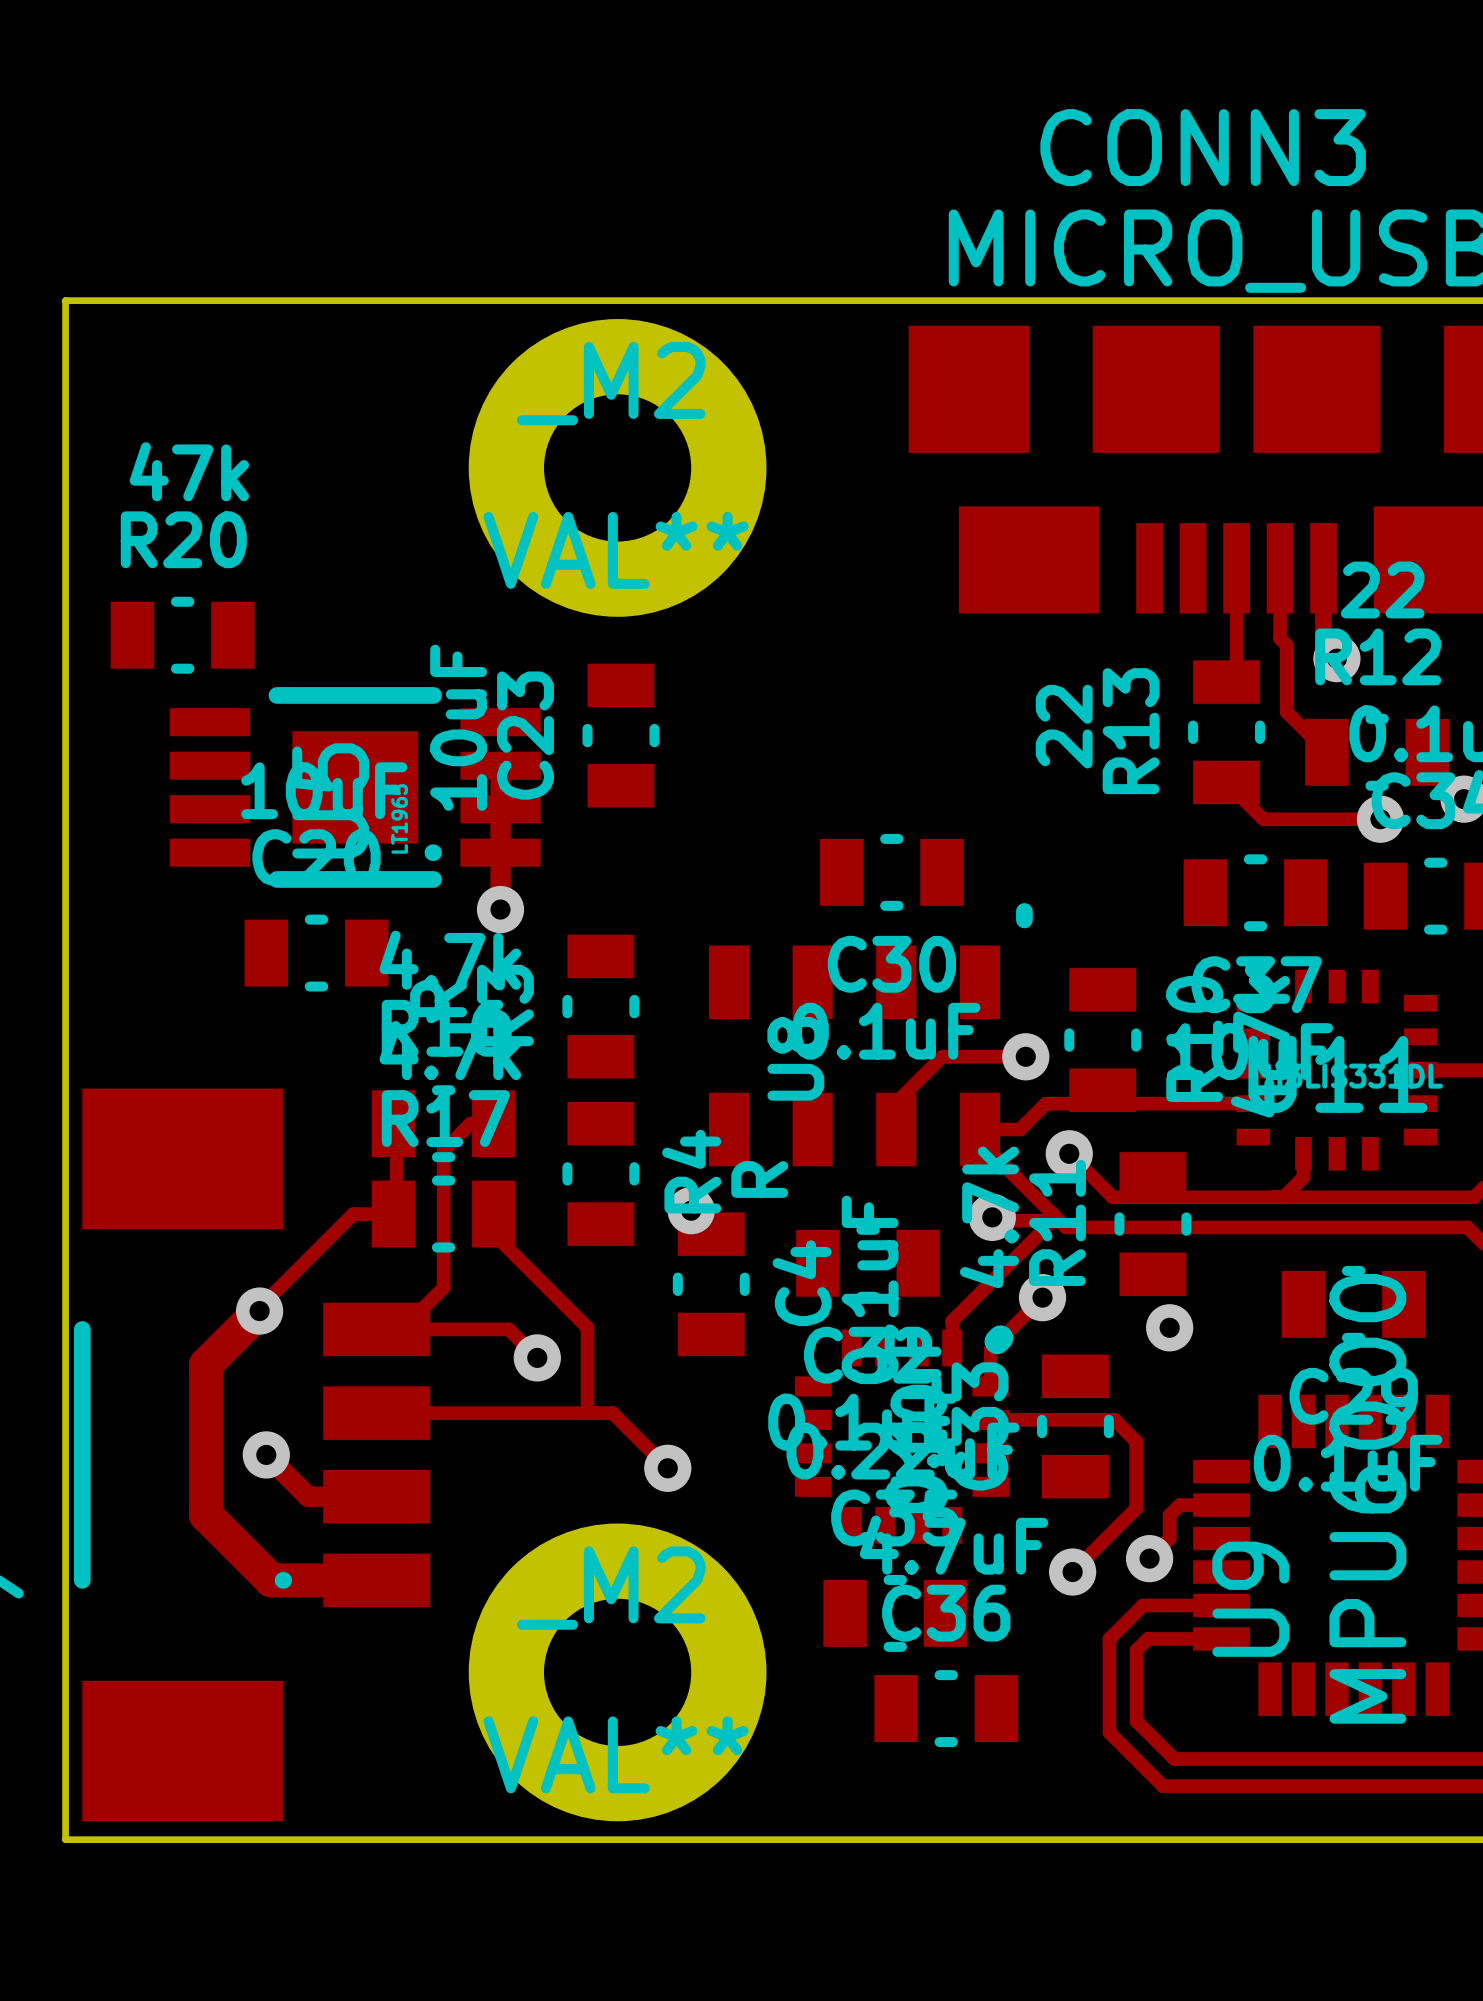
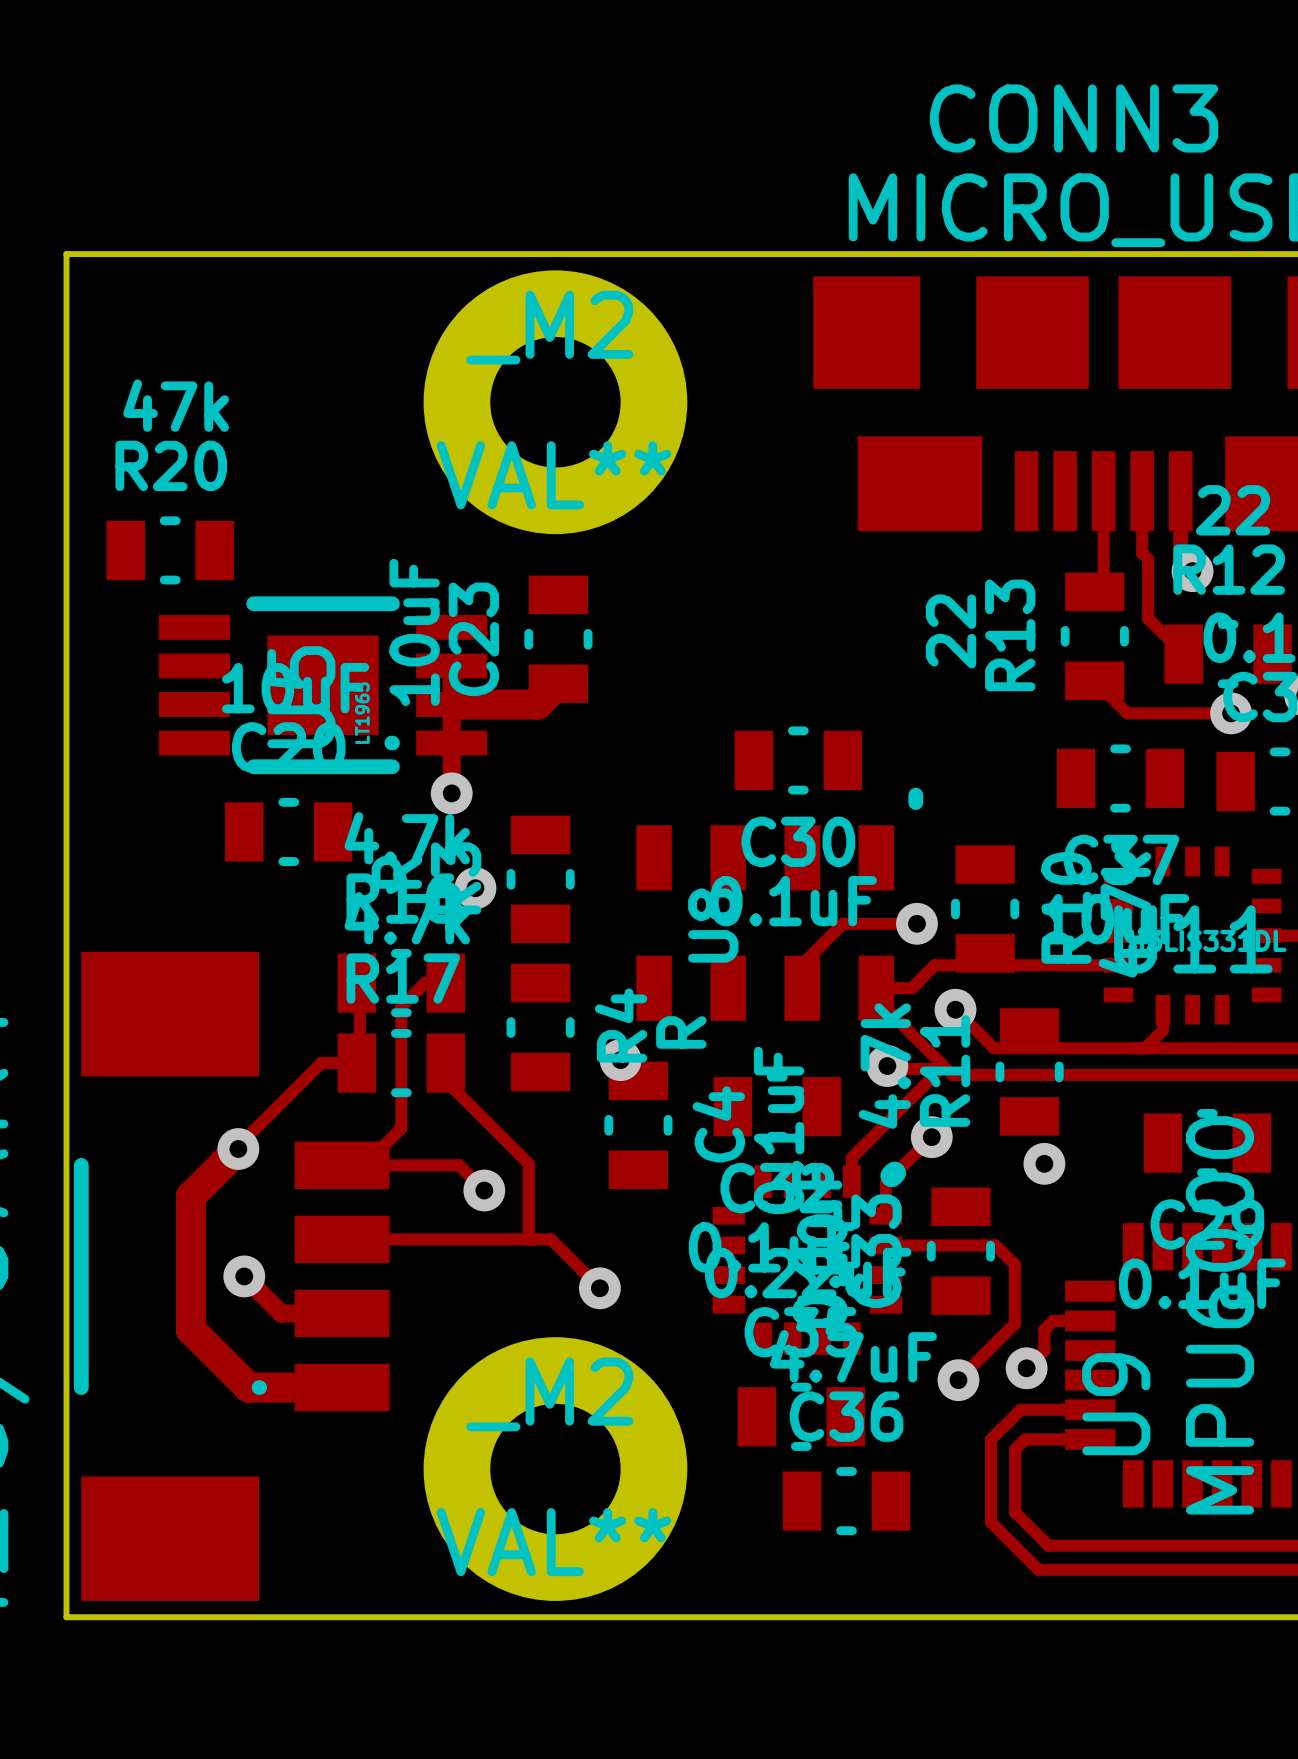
track: none -> (558, 683) (537, 704) (451, 704)
via: none -> (475, 888)

